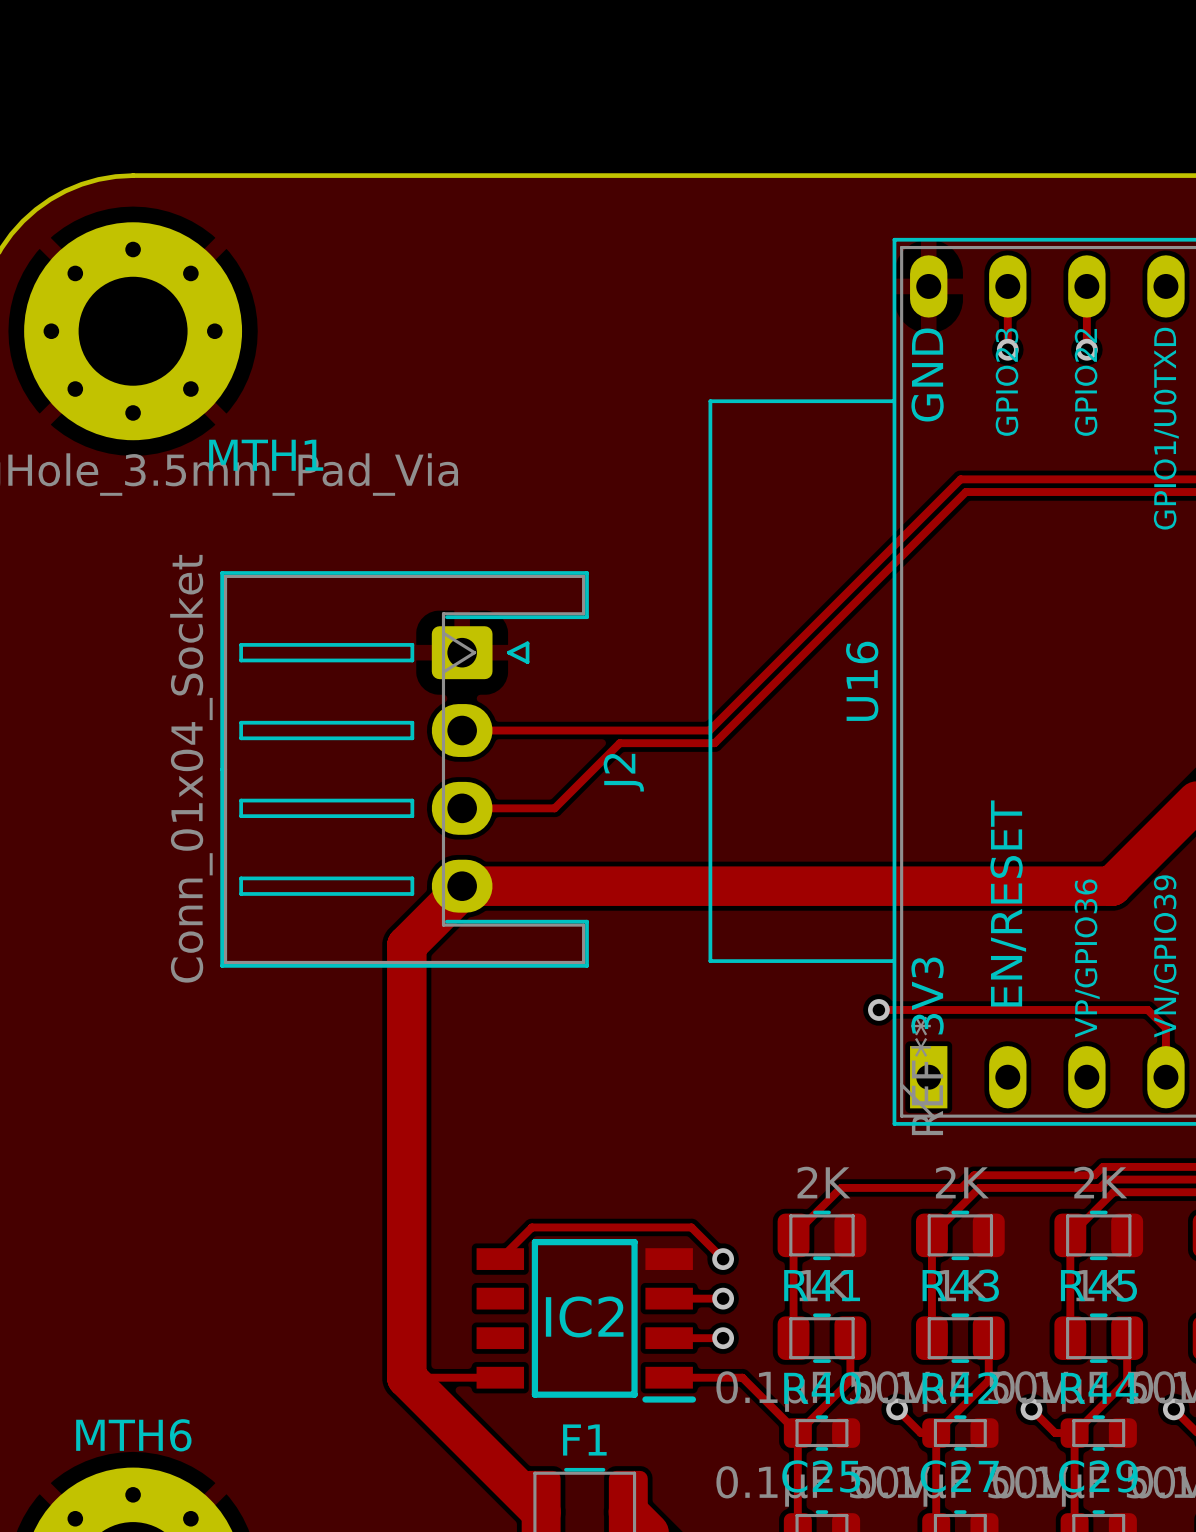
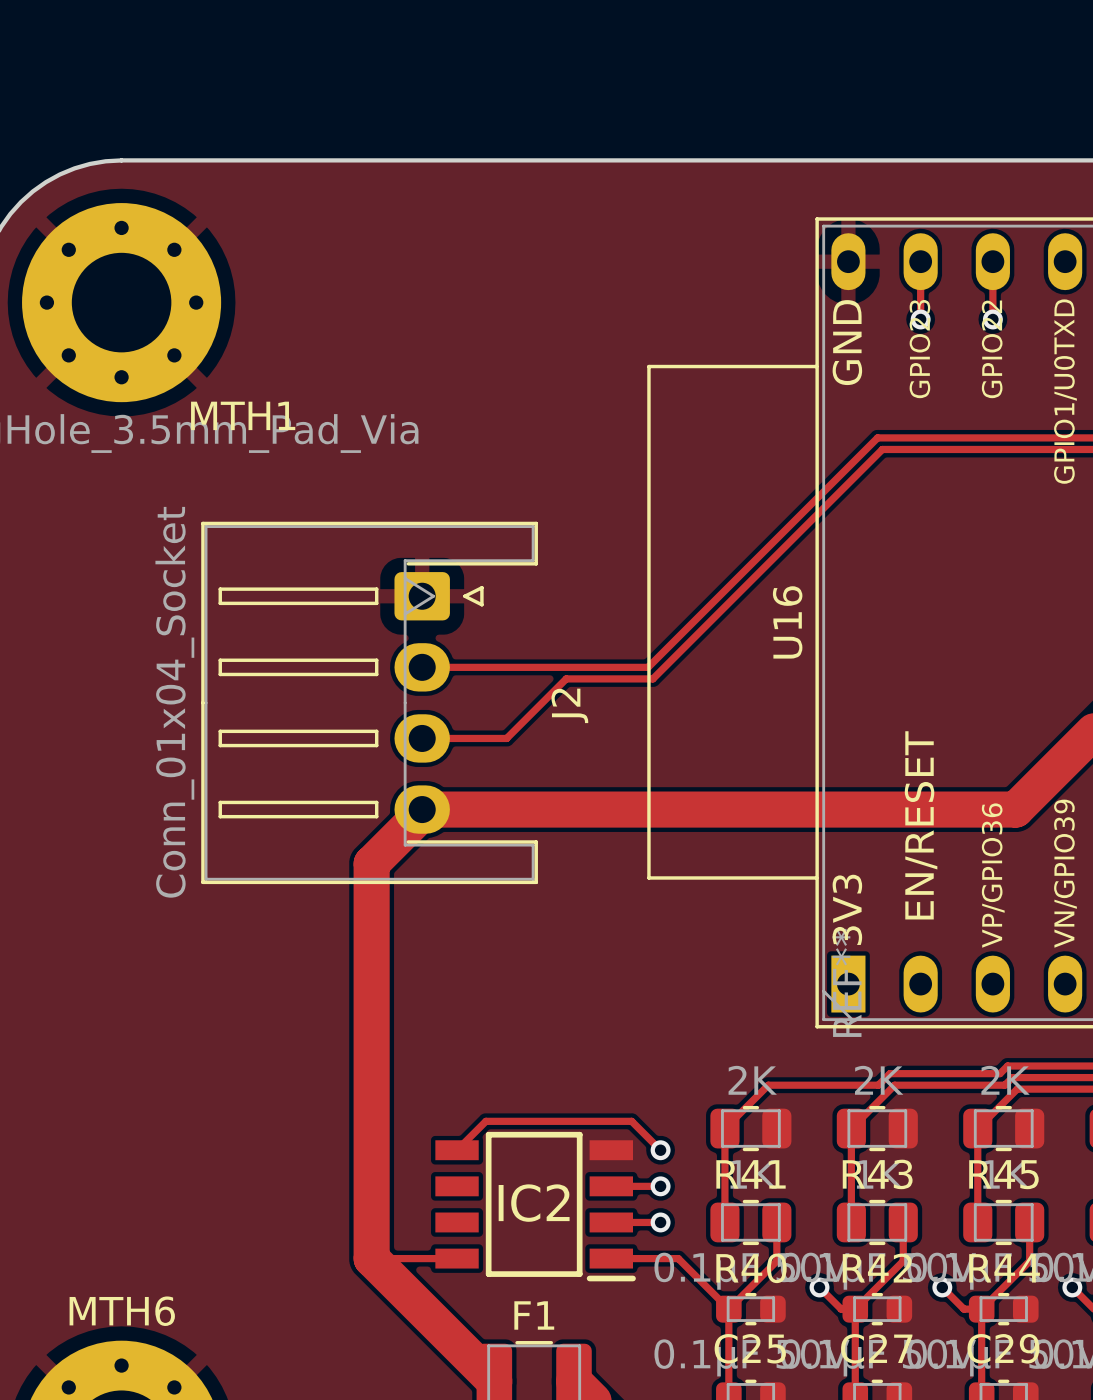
track: (878, 1009) (1147, 1009) (1165, 1028) (1165, 1077) -> none
via: (878, 1009) -> none

